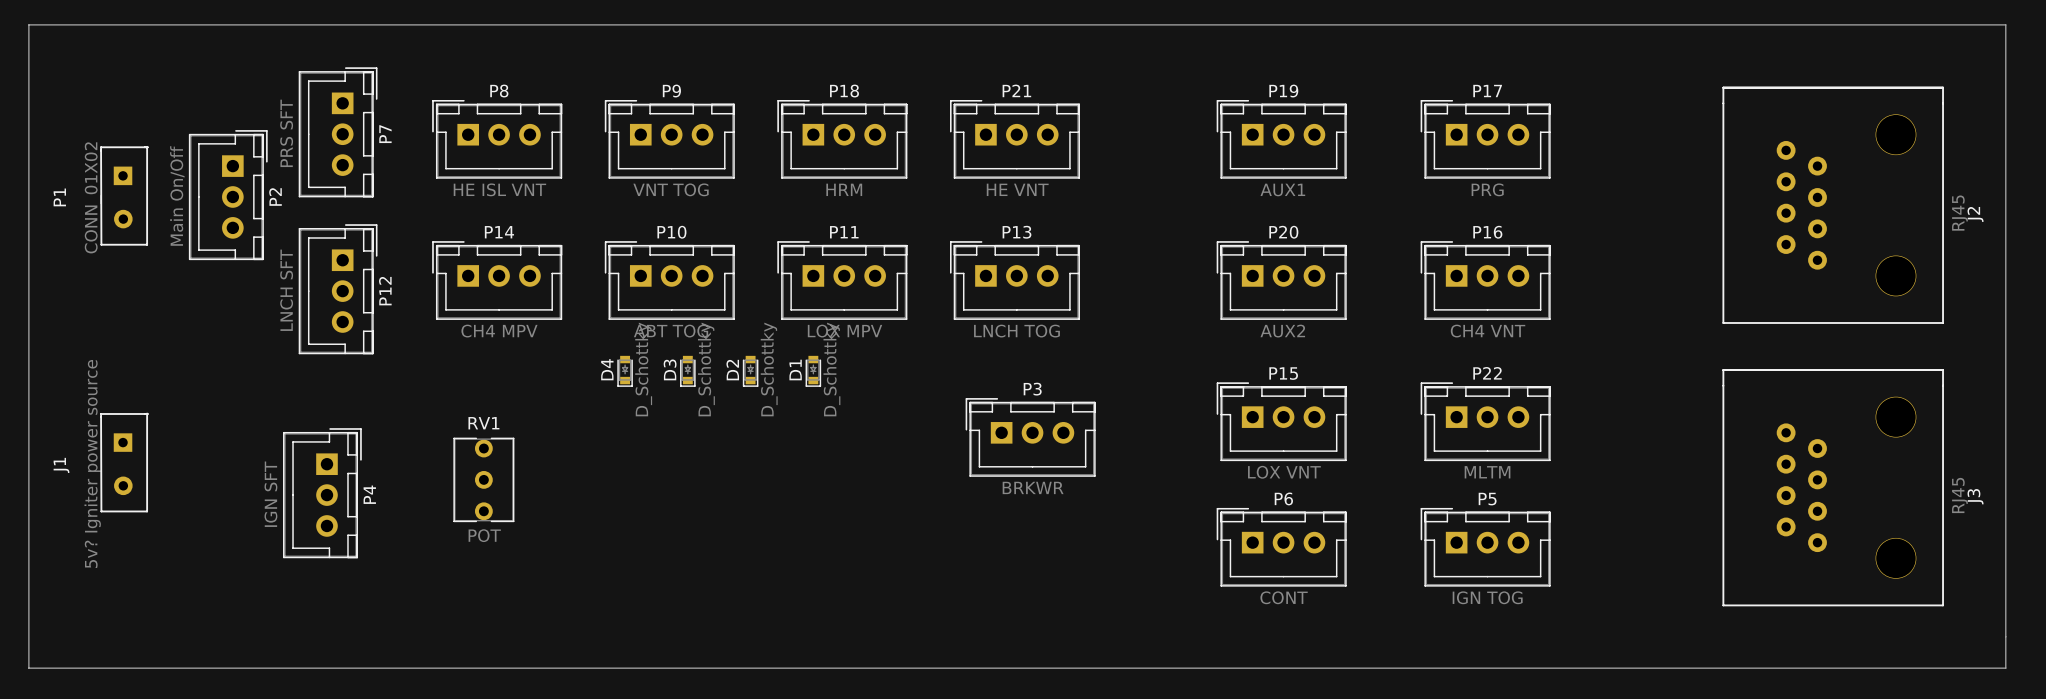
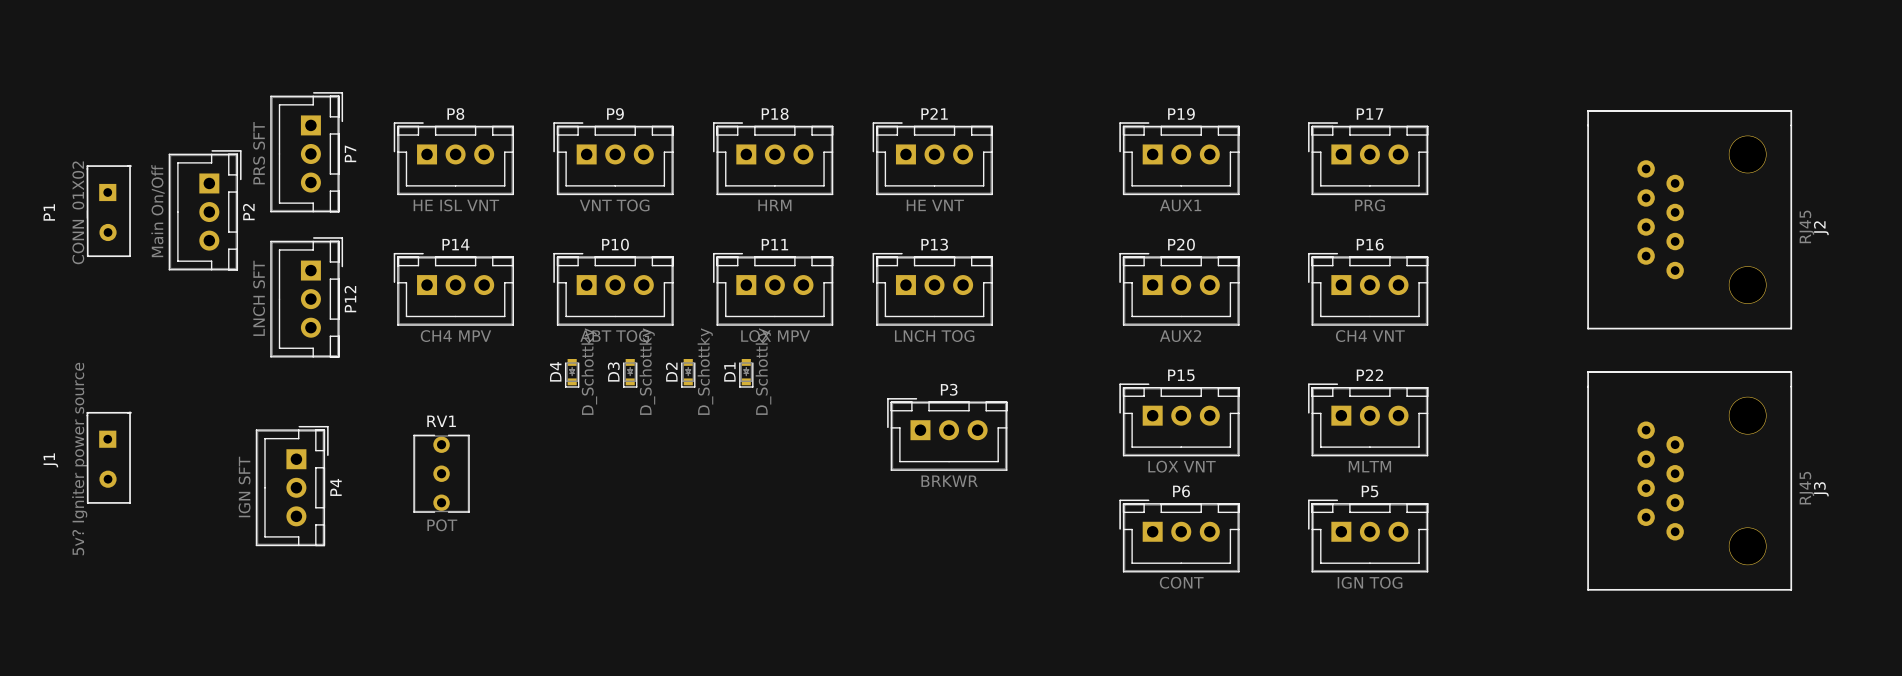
board edge: (28, 24) (28, 668) (2005, 668) (2005, 24) (28, 24) -> none

